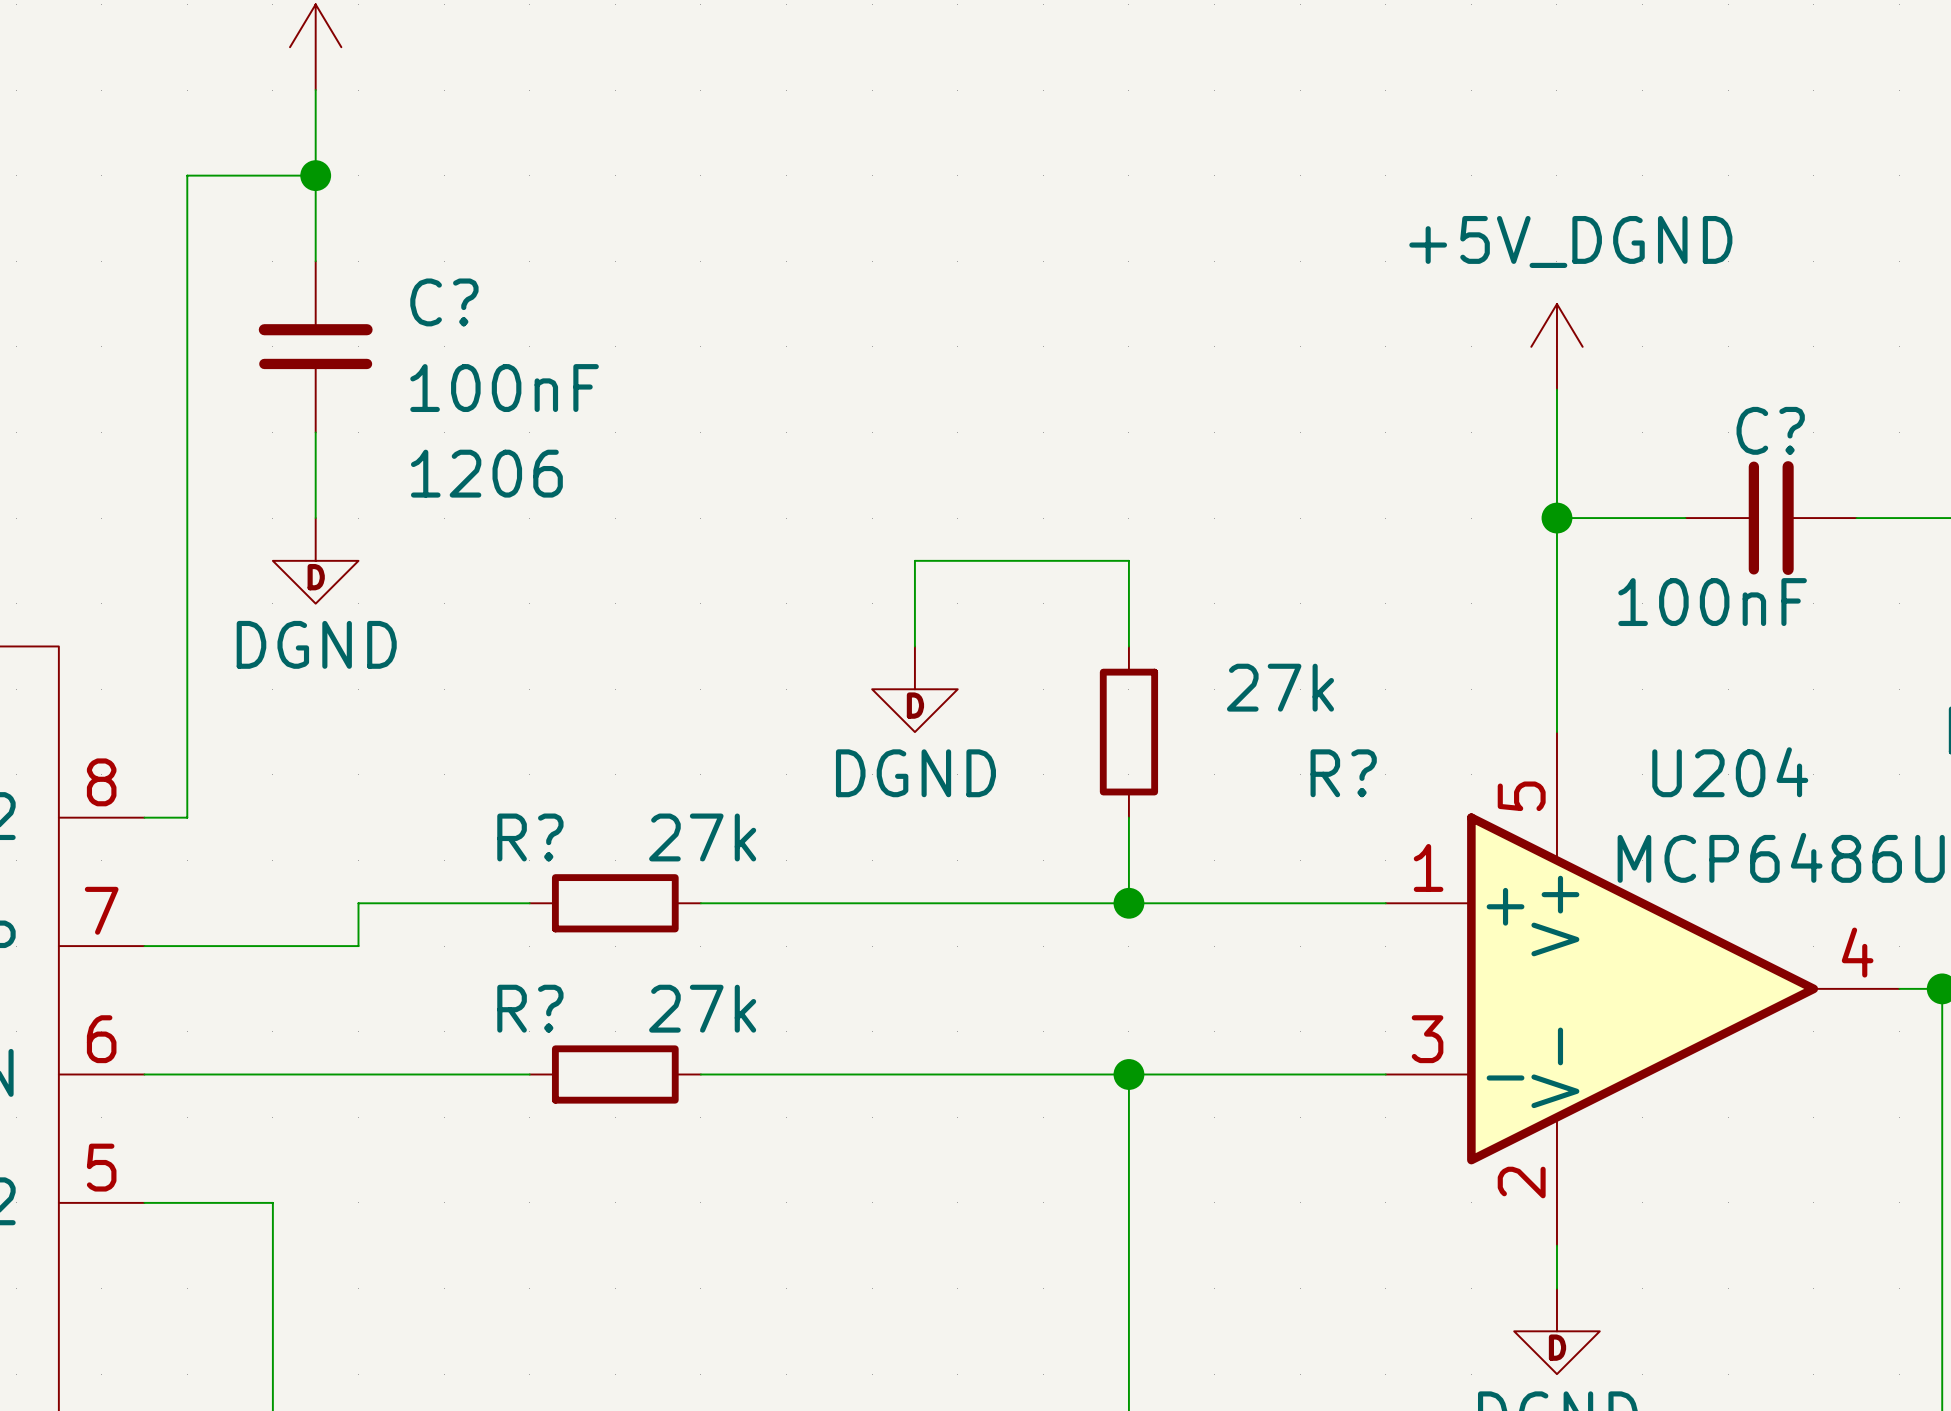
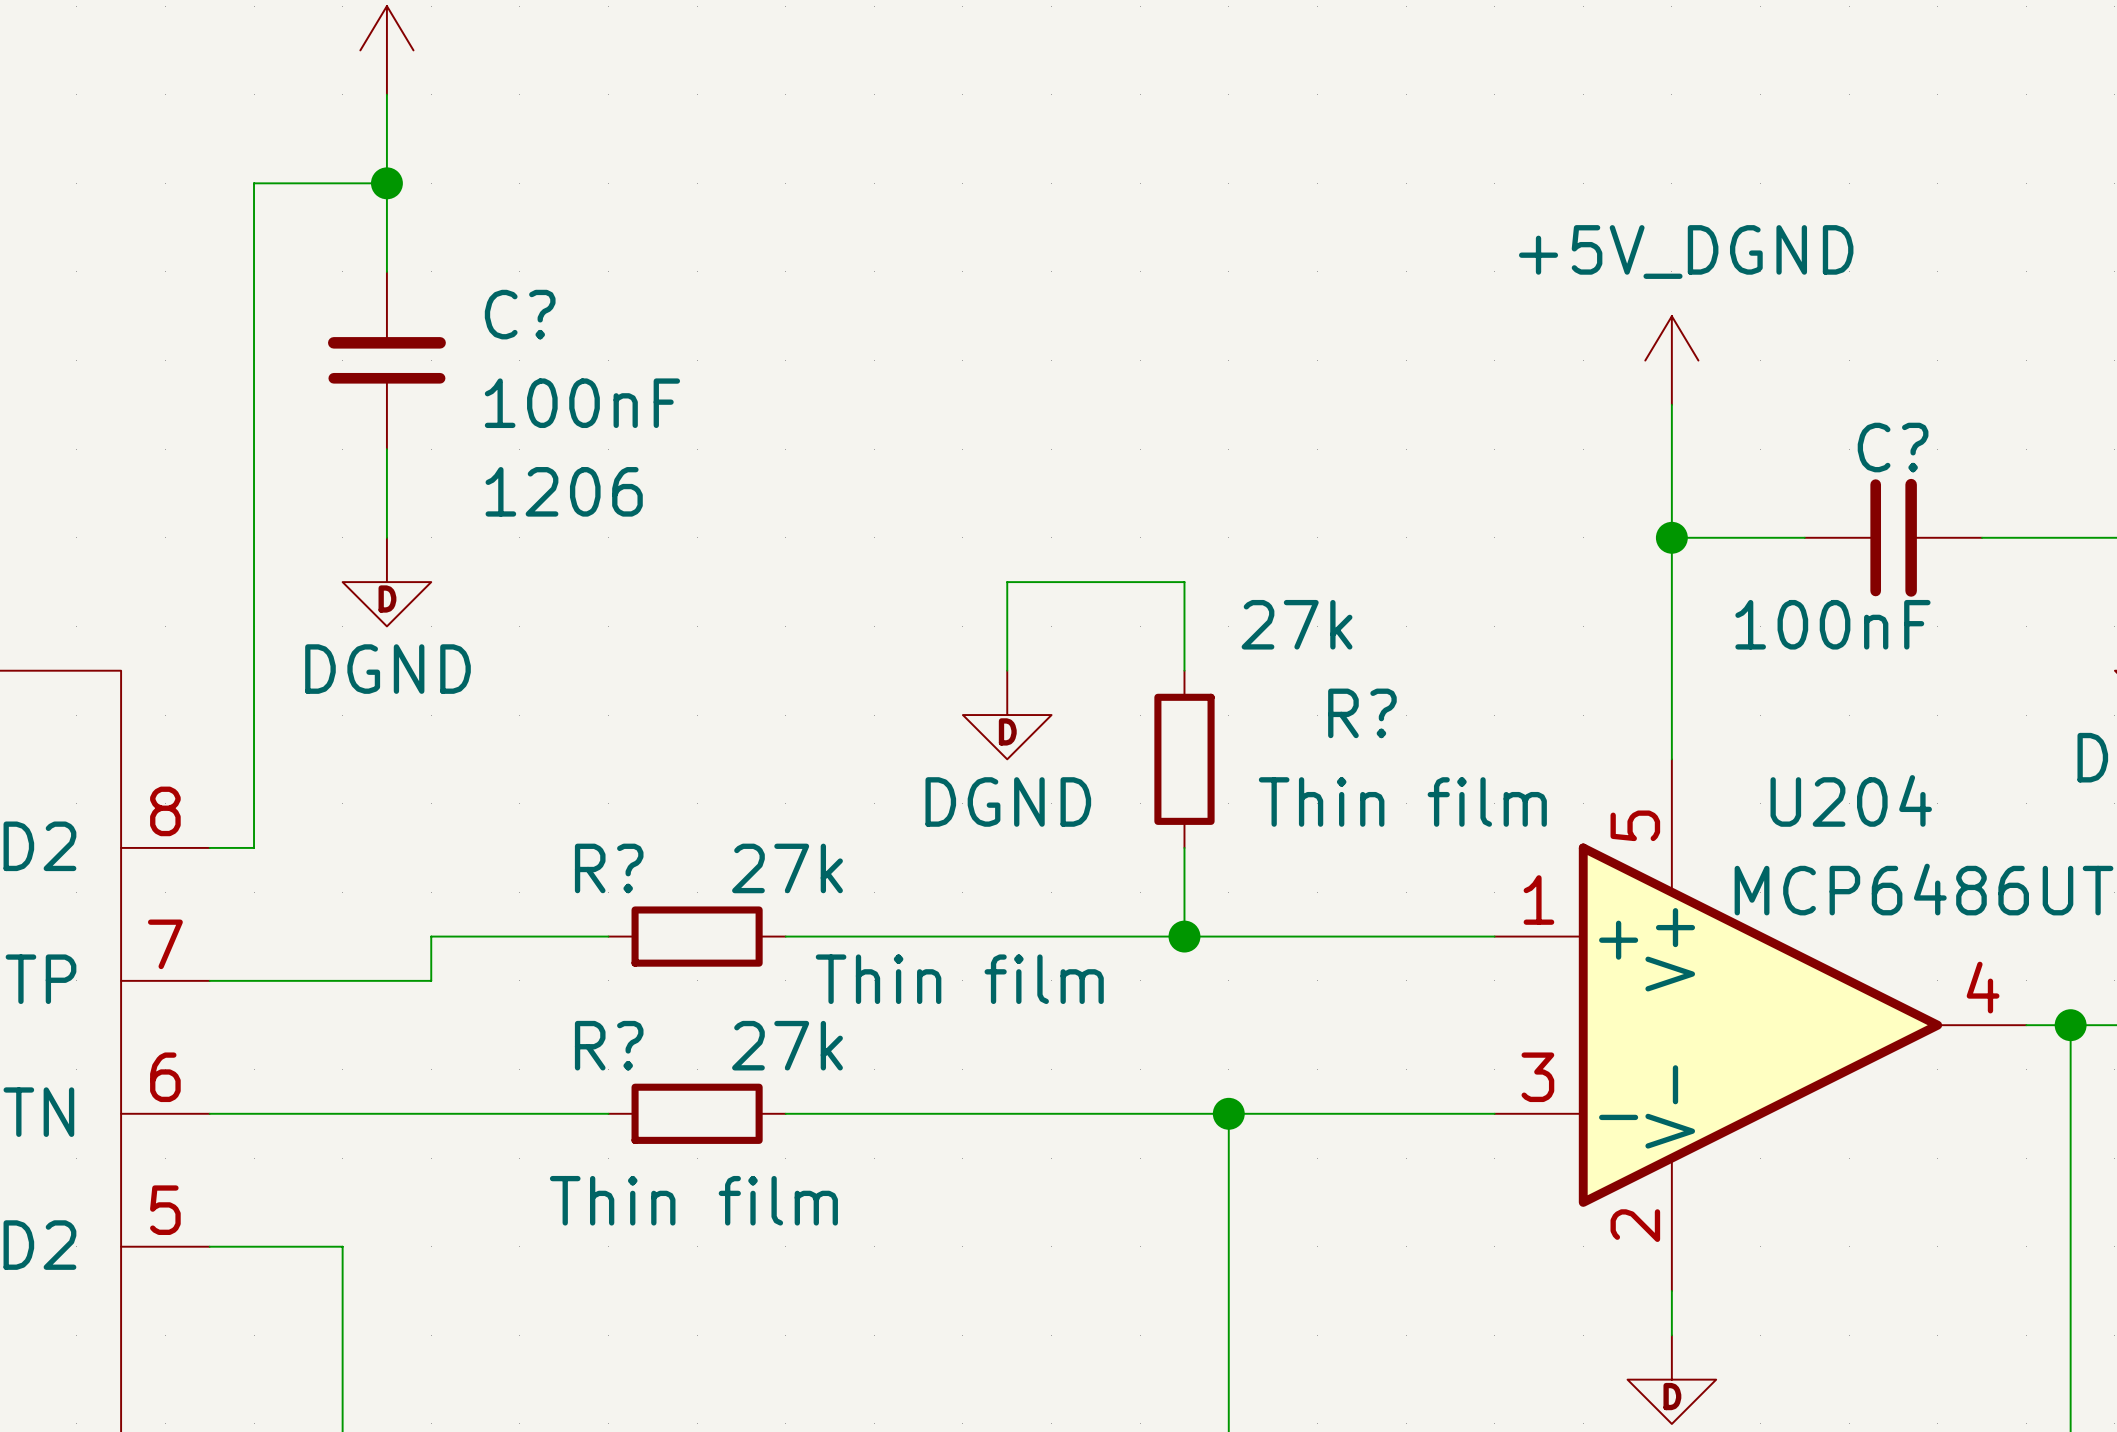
wire: (1086, 560) (1128, 560) (1128, 646) -> (1184, 582) (1184, 670)
R?: none -> 27k (1184, 759)
R?: 27k (1128, 732) -> none
wire: (1128, 817) (1128, 903) -> (1184, 847) (1184, 936)
junction position: (1128, 903) -> (1184, 936)
R? text: none -> Thin film (959, 979)
R? text: none -> Thin film (693, 1200)

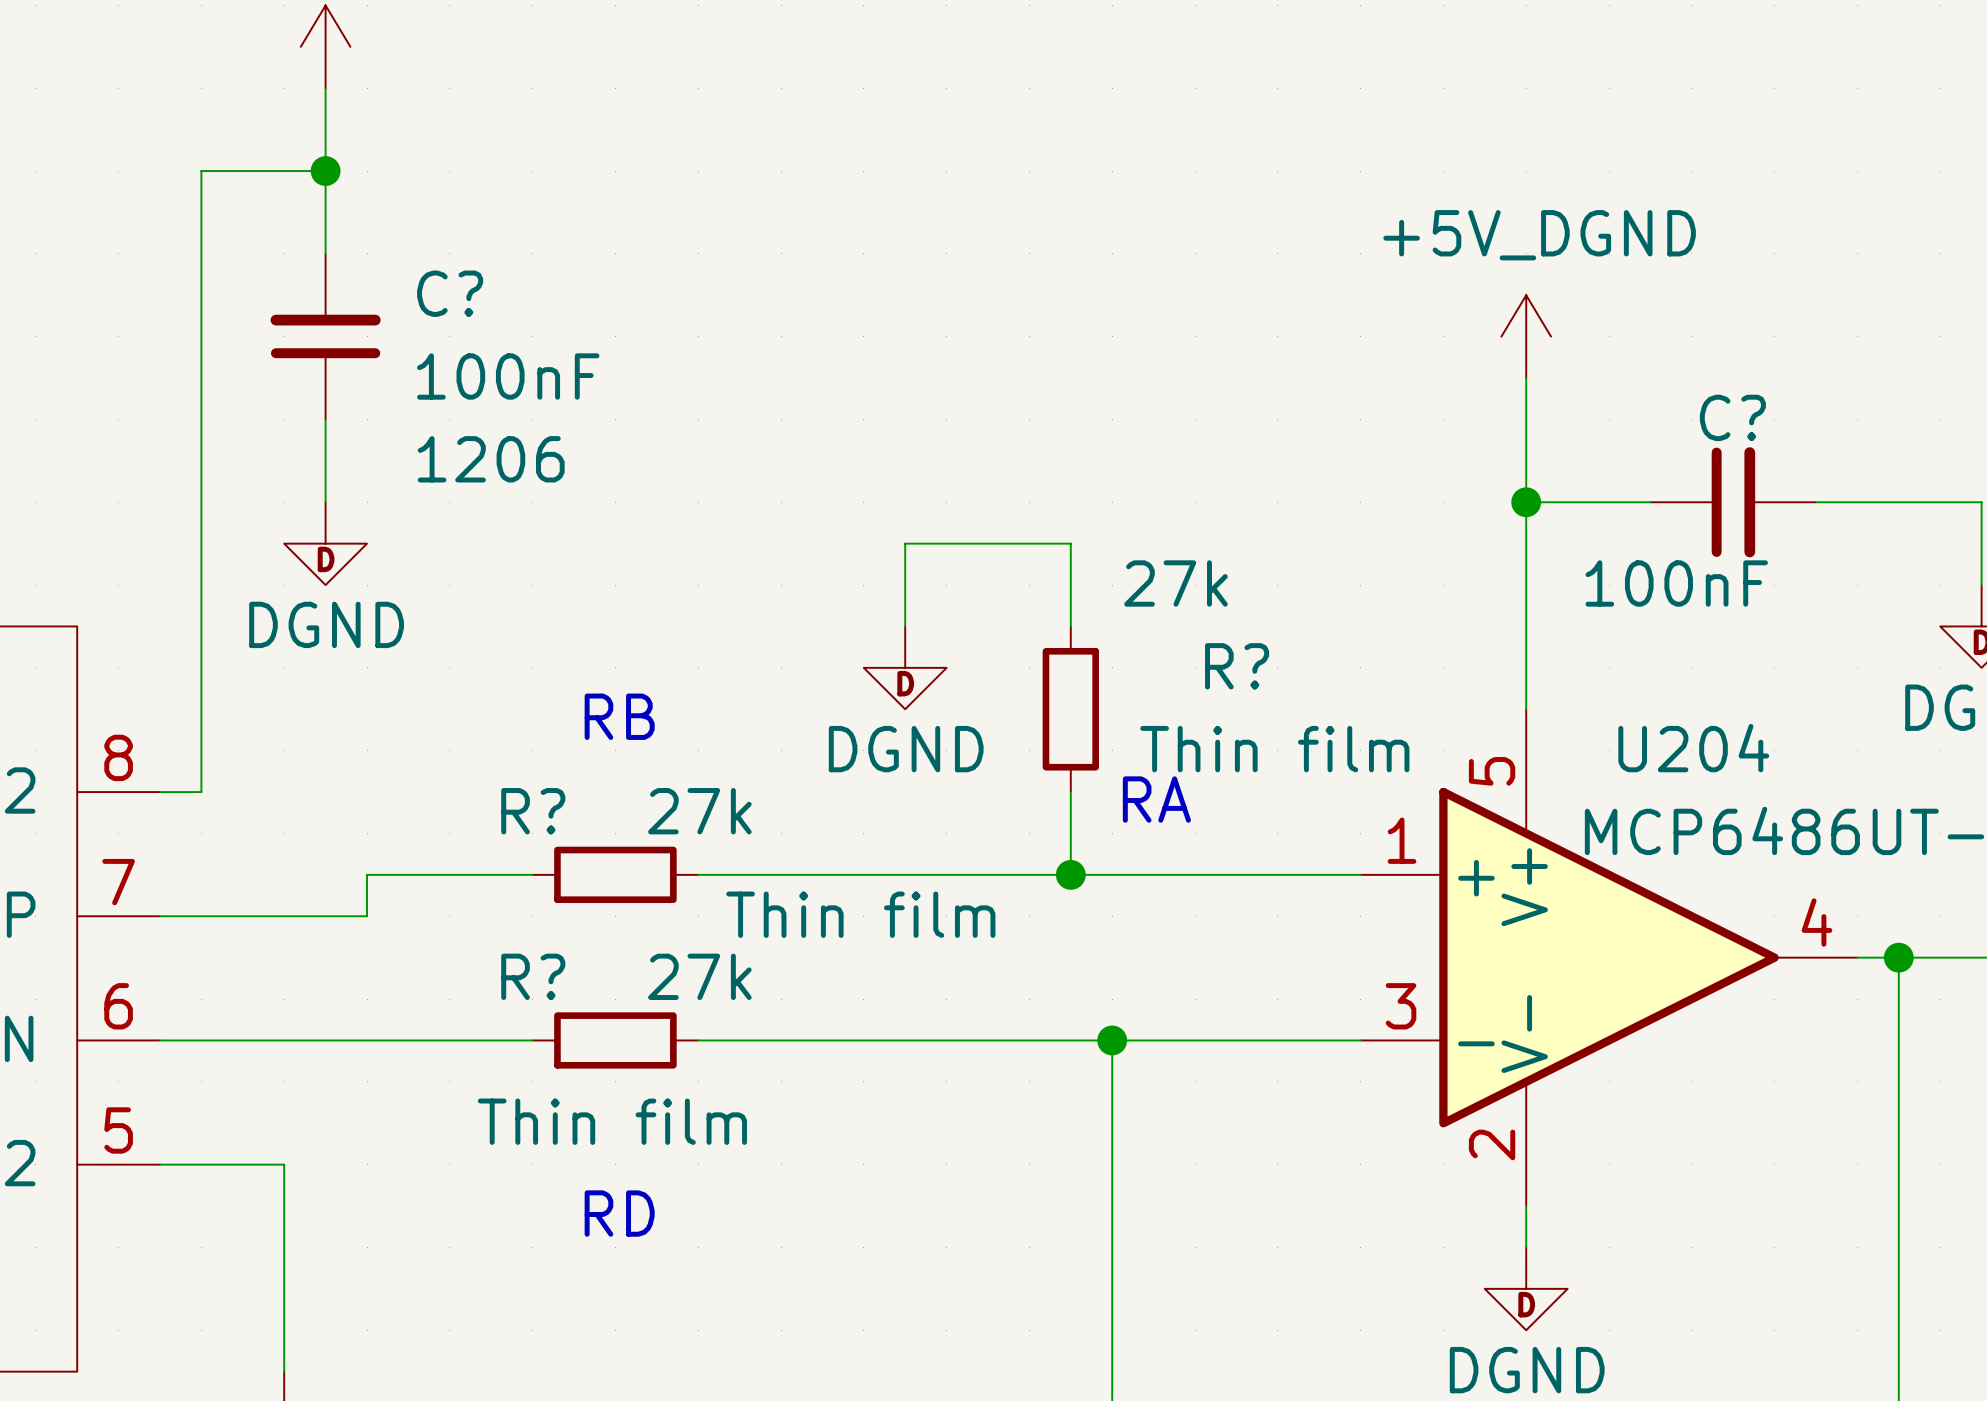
text: none -> RB (619, 716)
text: none -> RA (1156, 799)
text: none -> RD (619, 1213)

